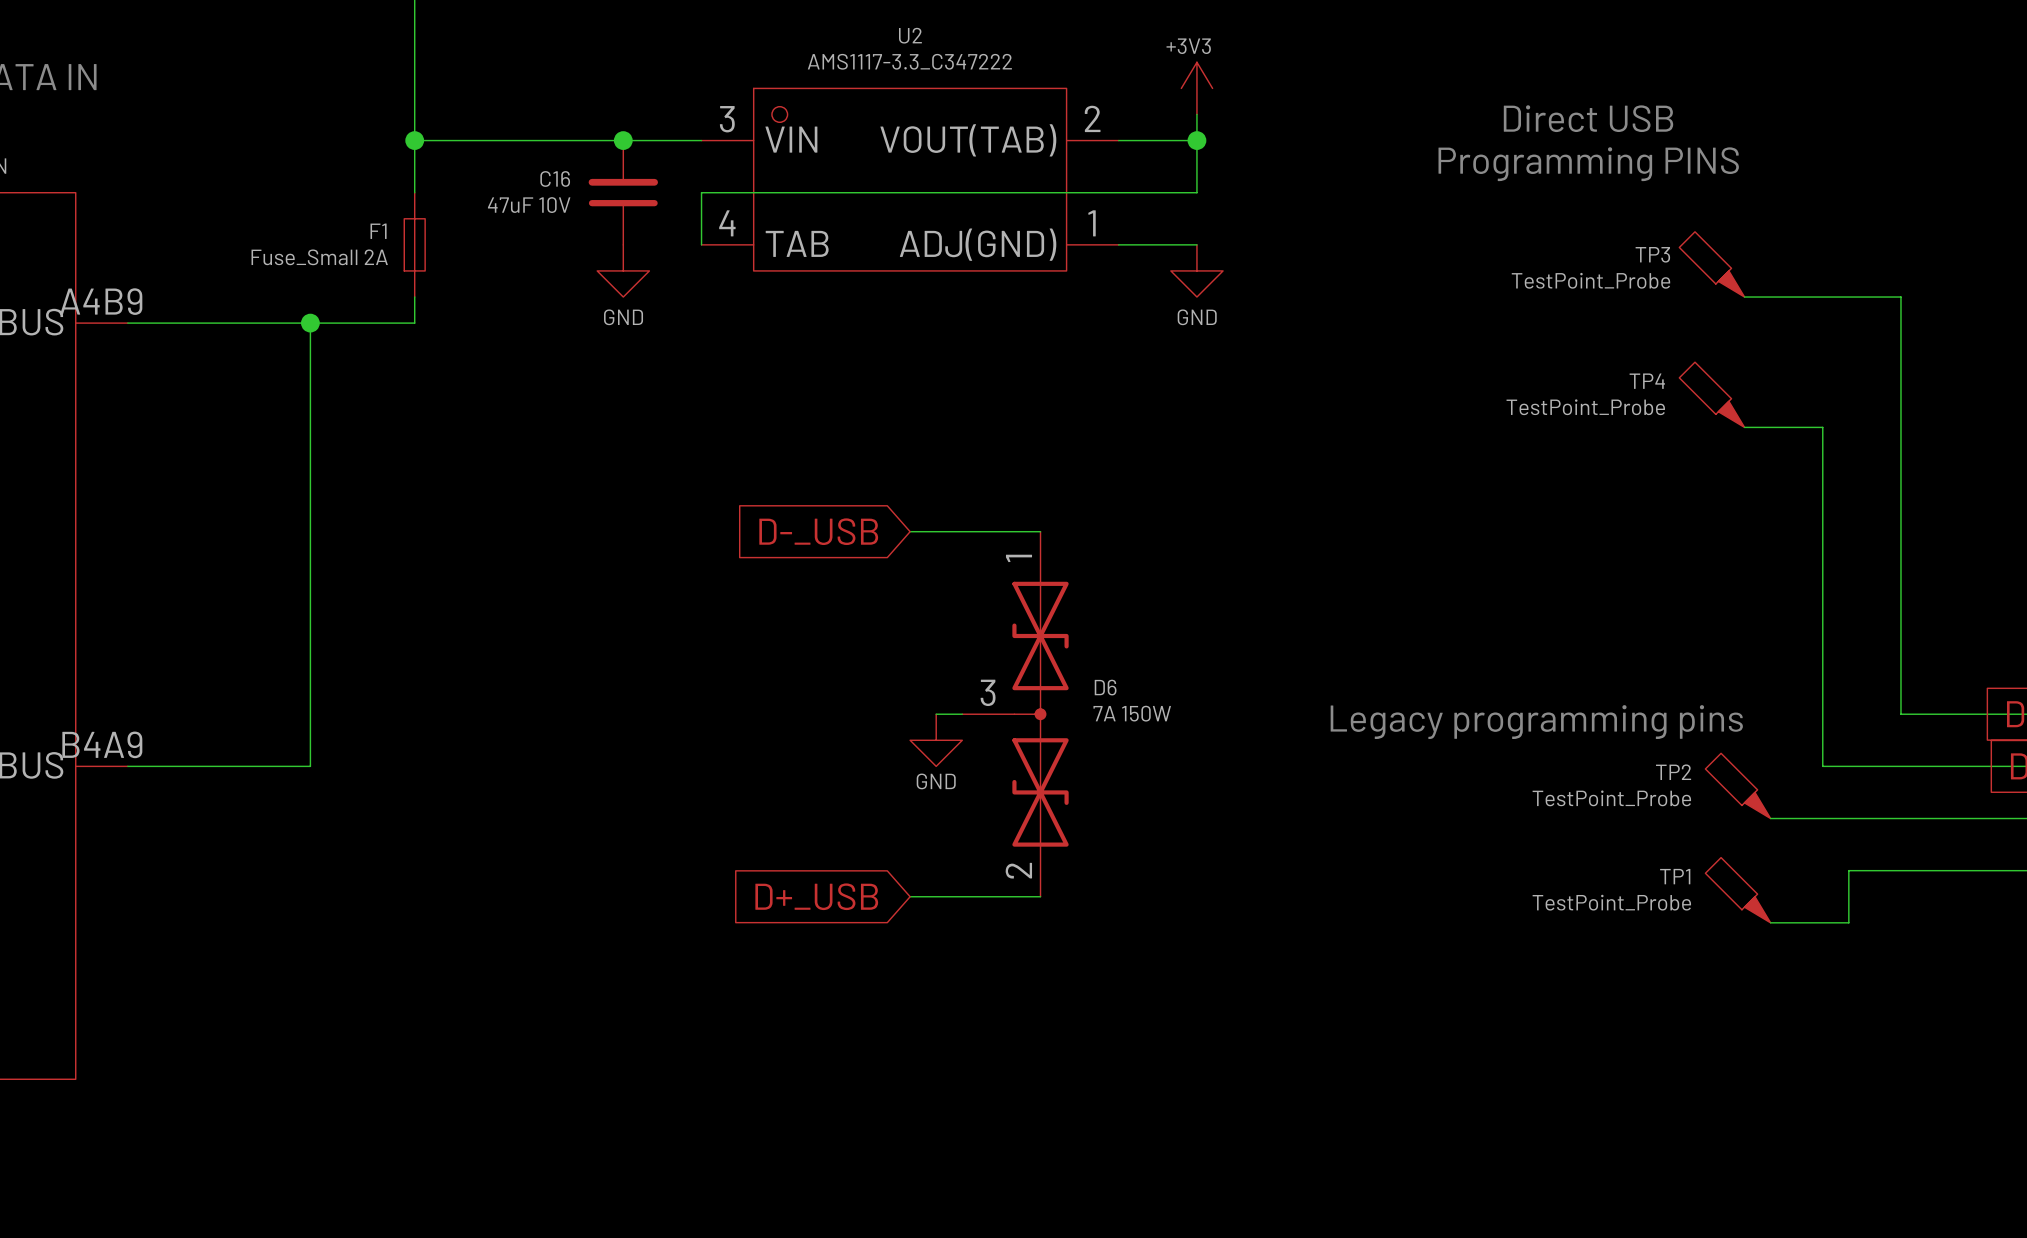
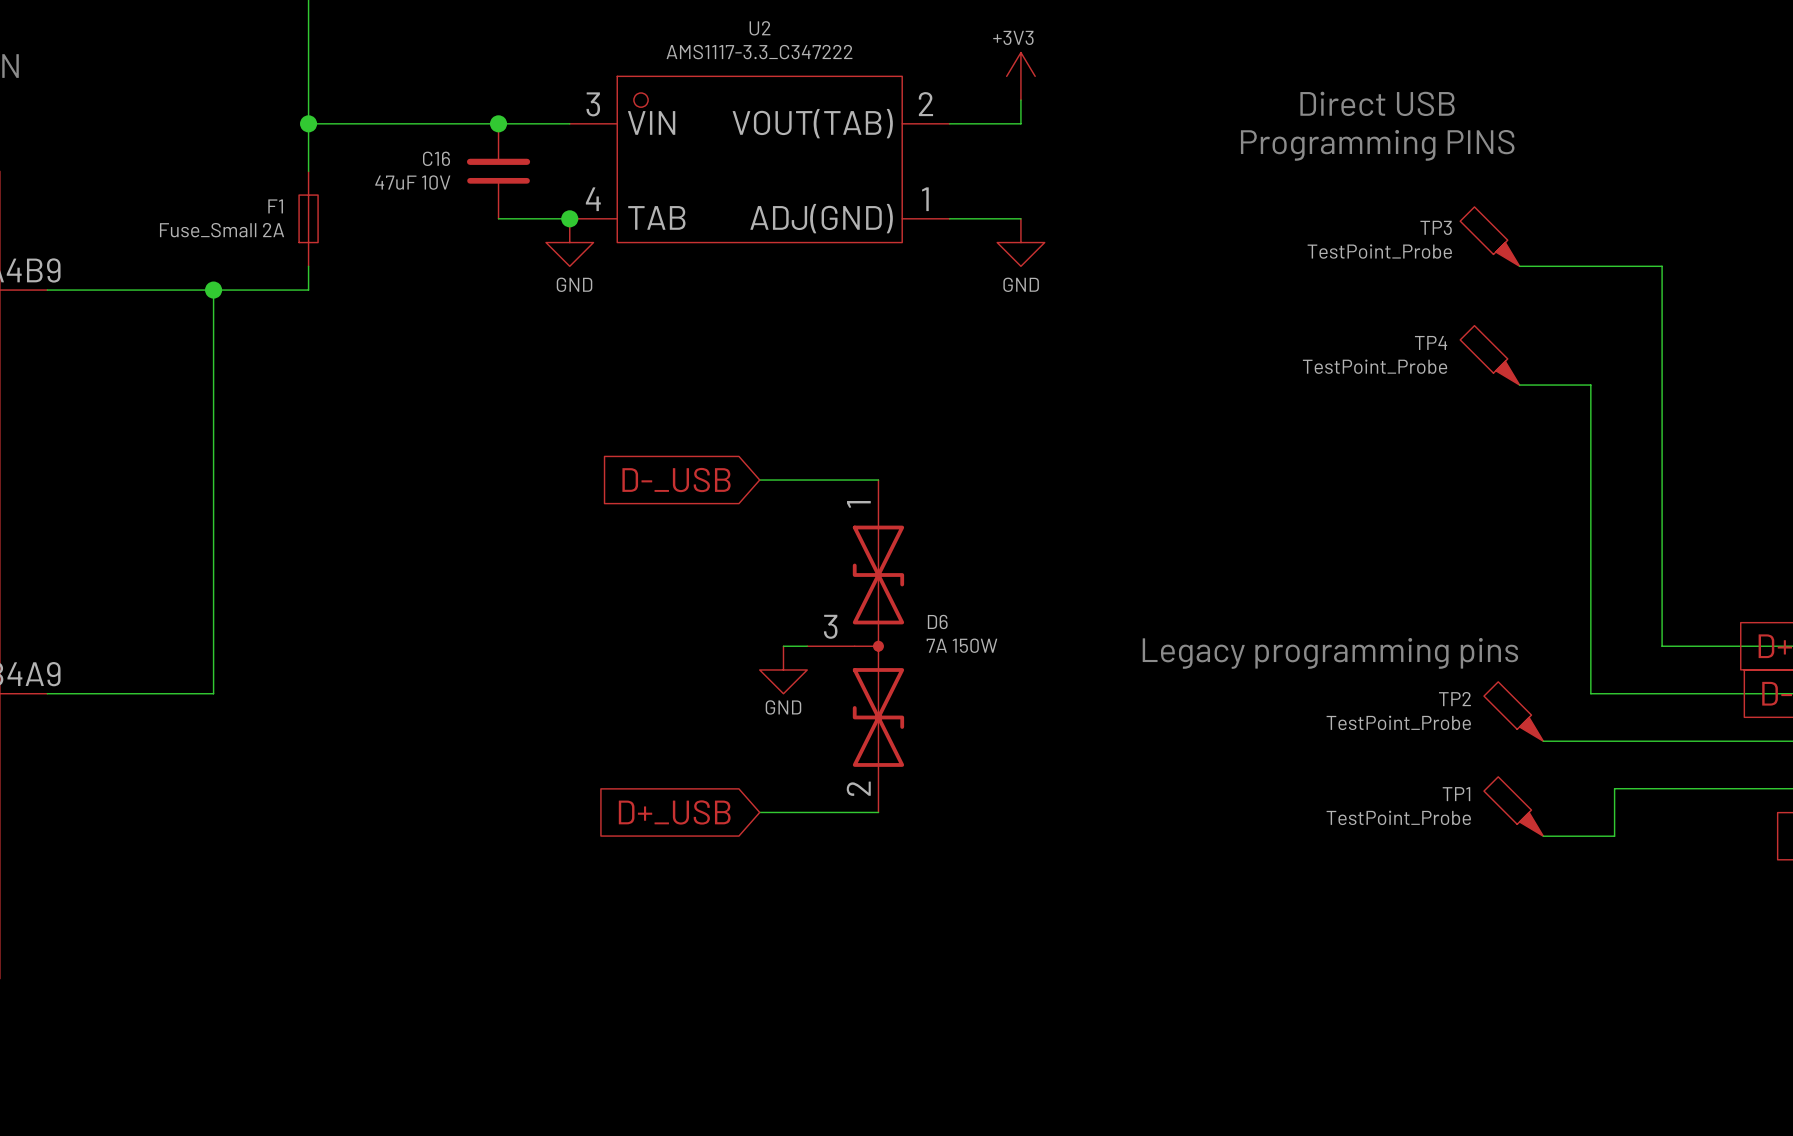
wire: (1196, 140) (1196, 192) (701, 192) (701, 244) -> (498, 218) (569, 218)
junction: (1196, 140) -> none
junction: none -> (569, 218)
power symbol position: GND (623, 270) -> GND (569, 242)
power symbol text position: GND (623, 317) -> GND (574, 284)

